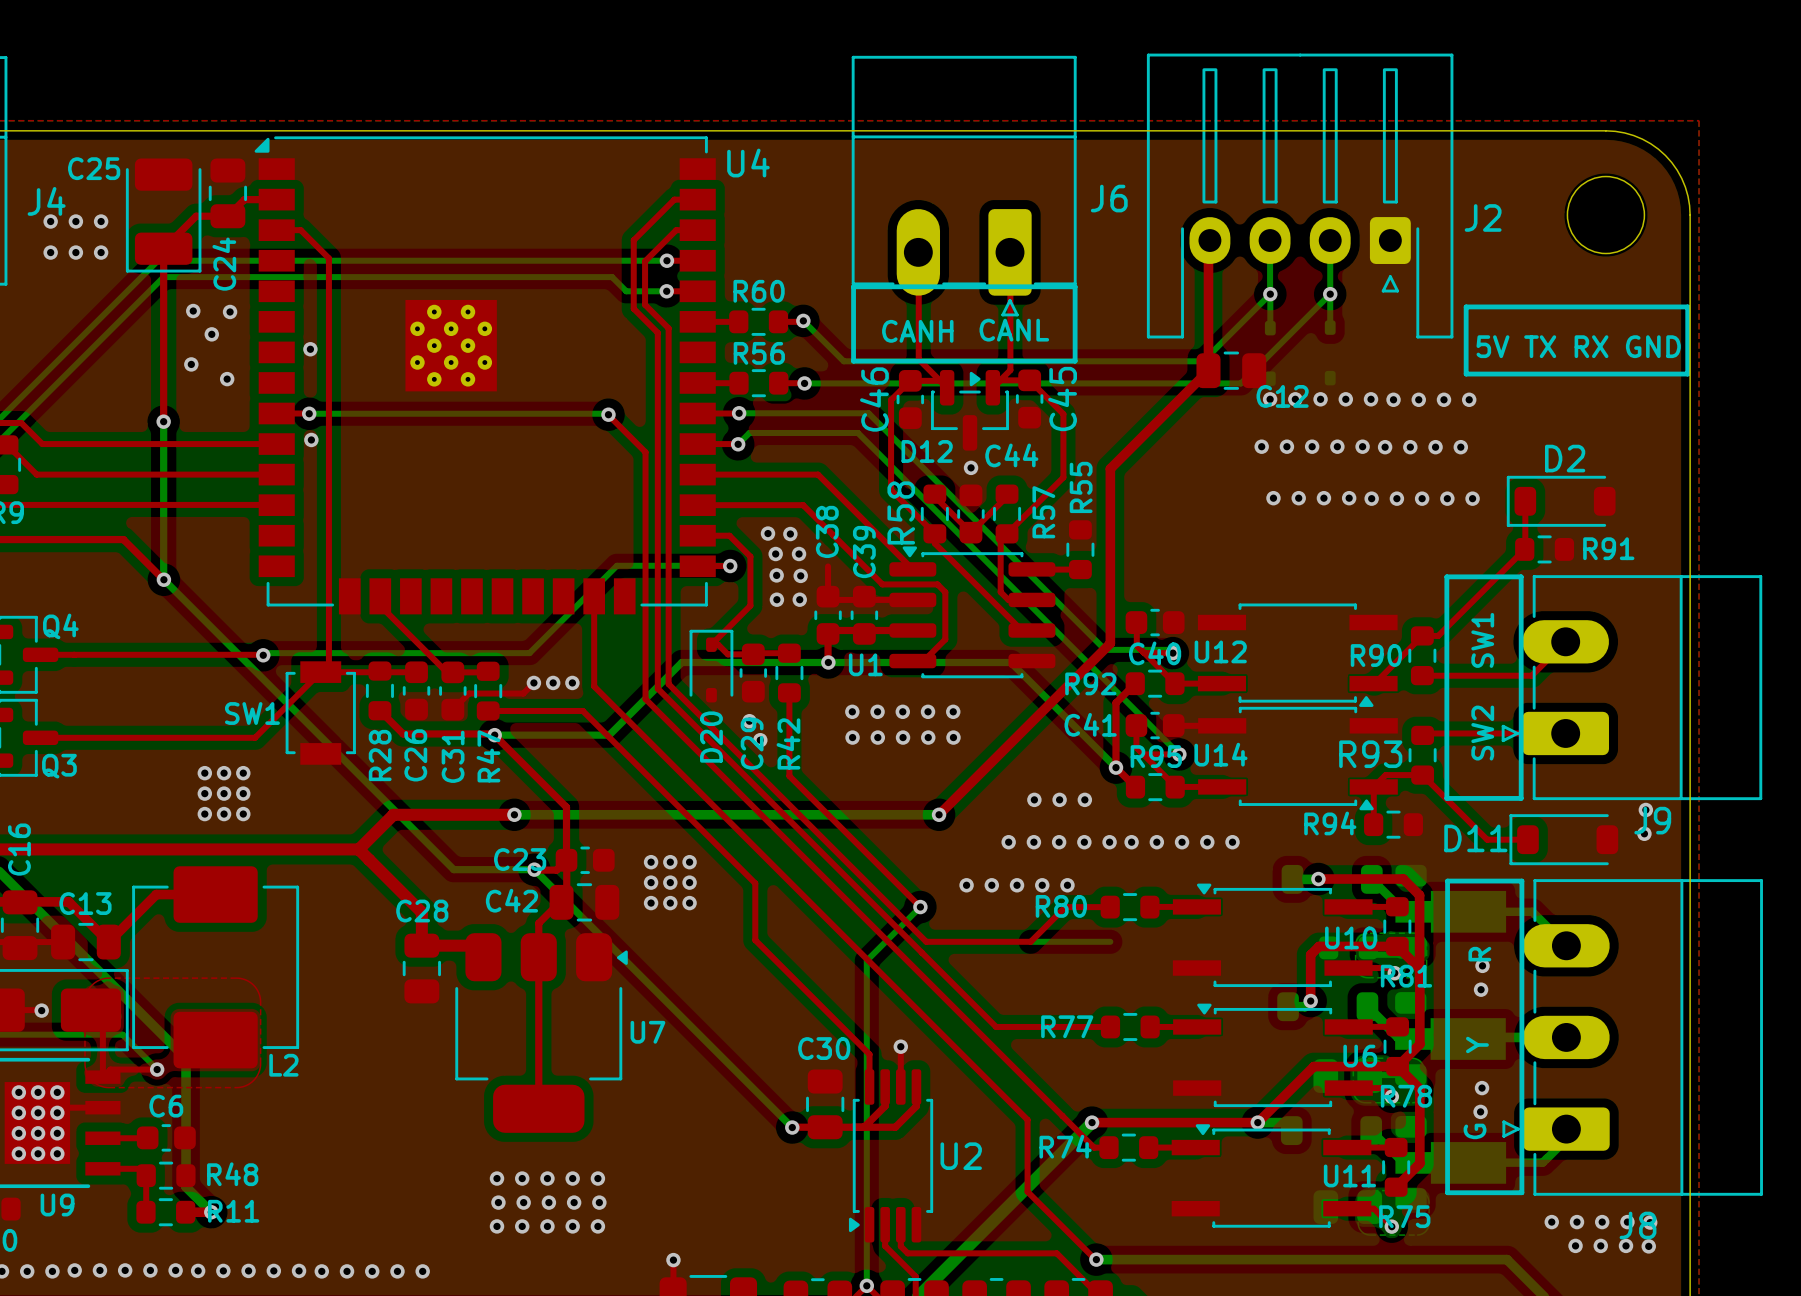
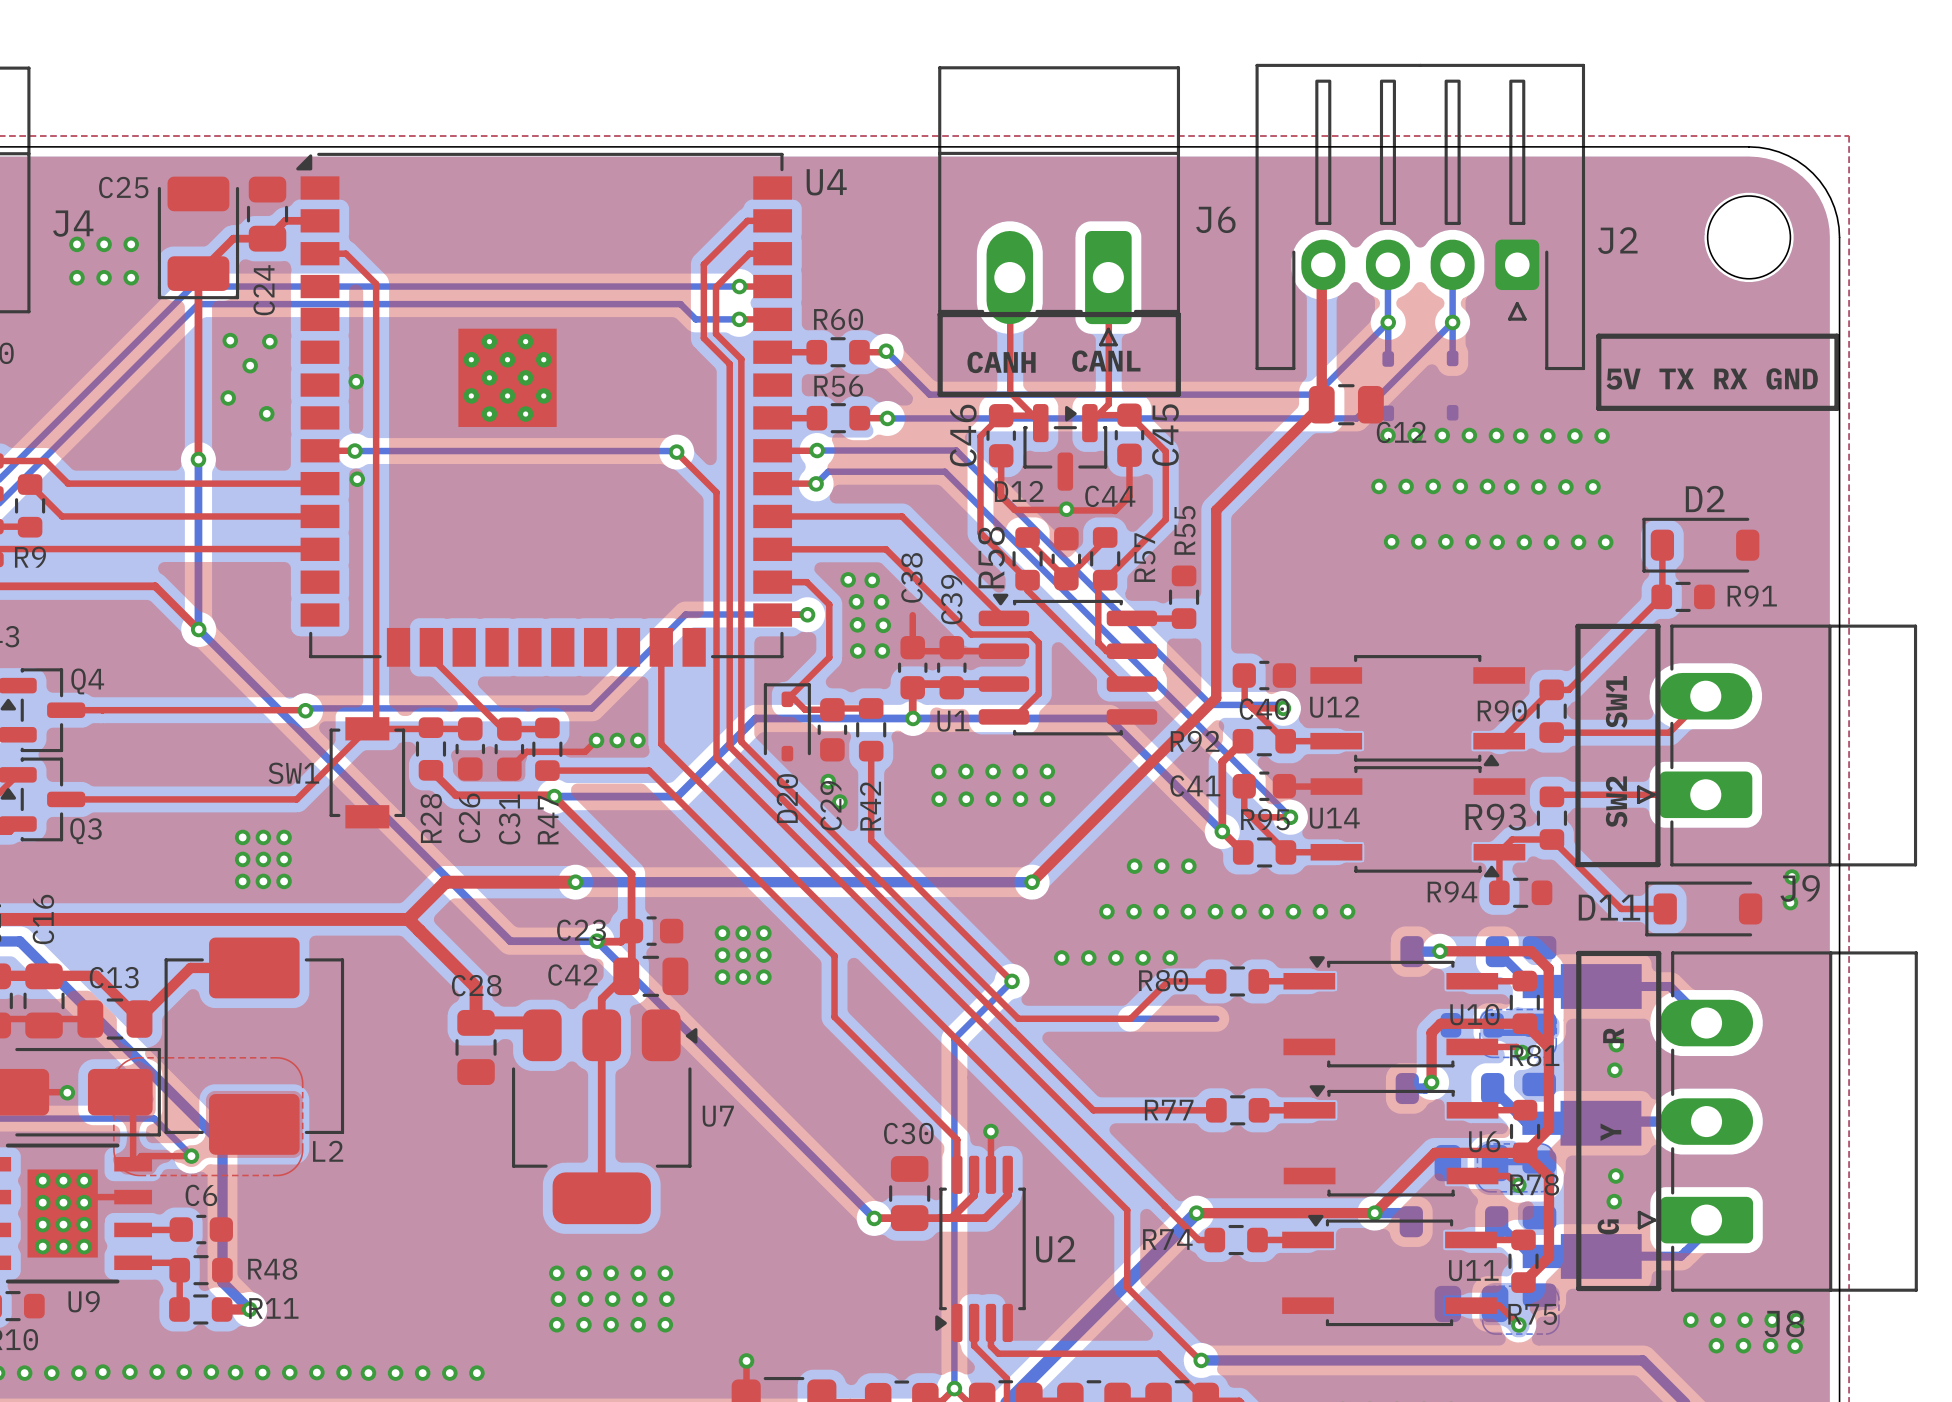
top track: none -> (1129, 455) (1129, 496) (1114, 510) (1014, 509) (1001, 496) (1001, 455)

